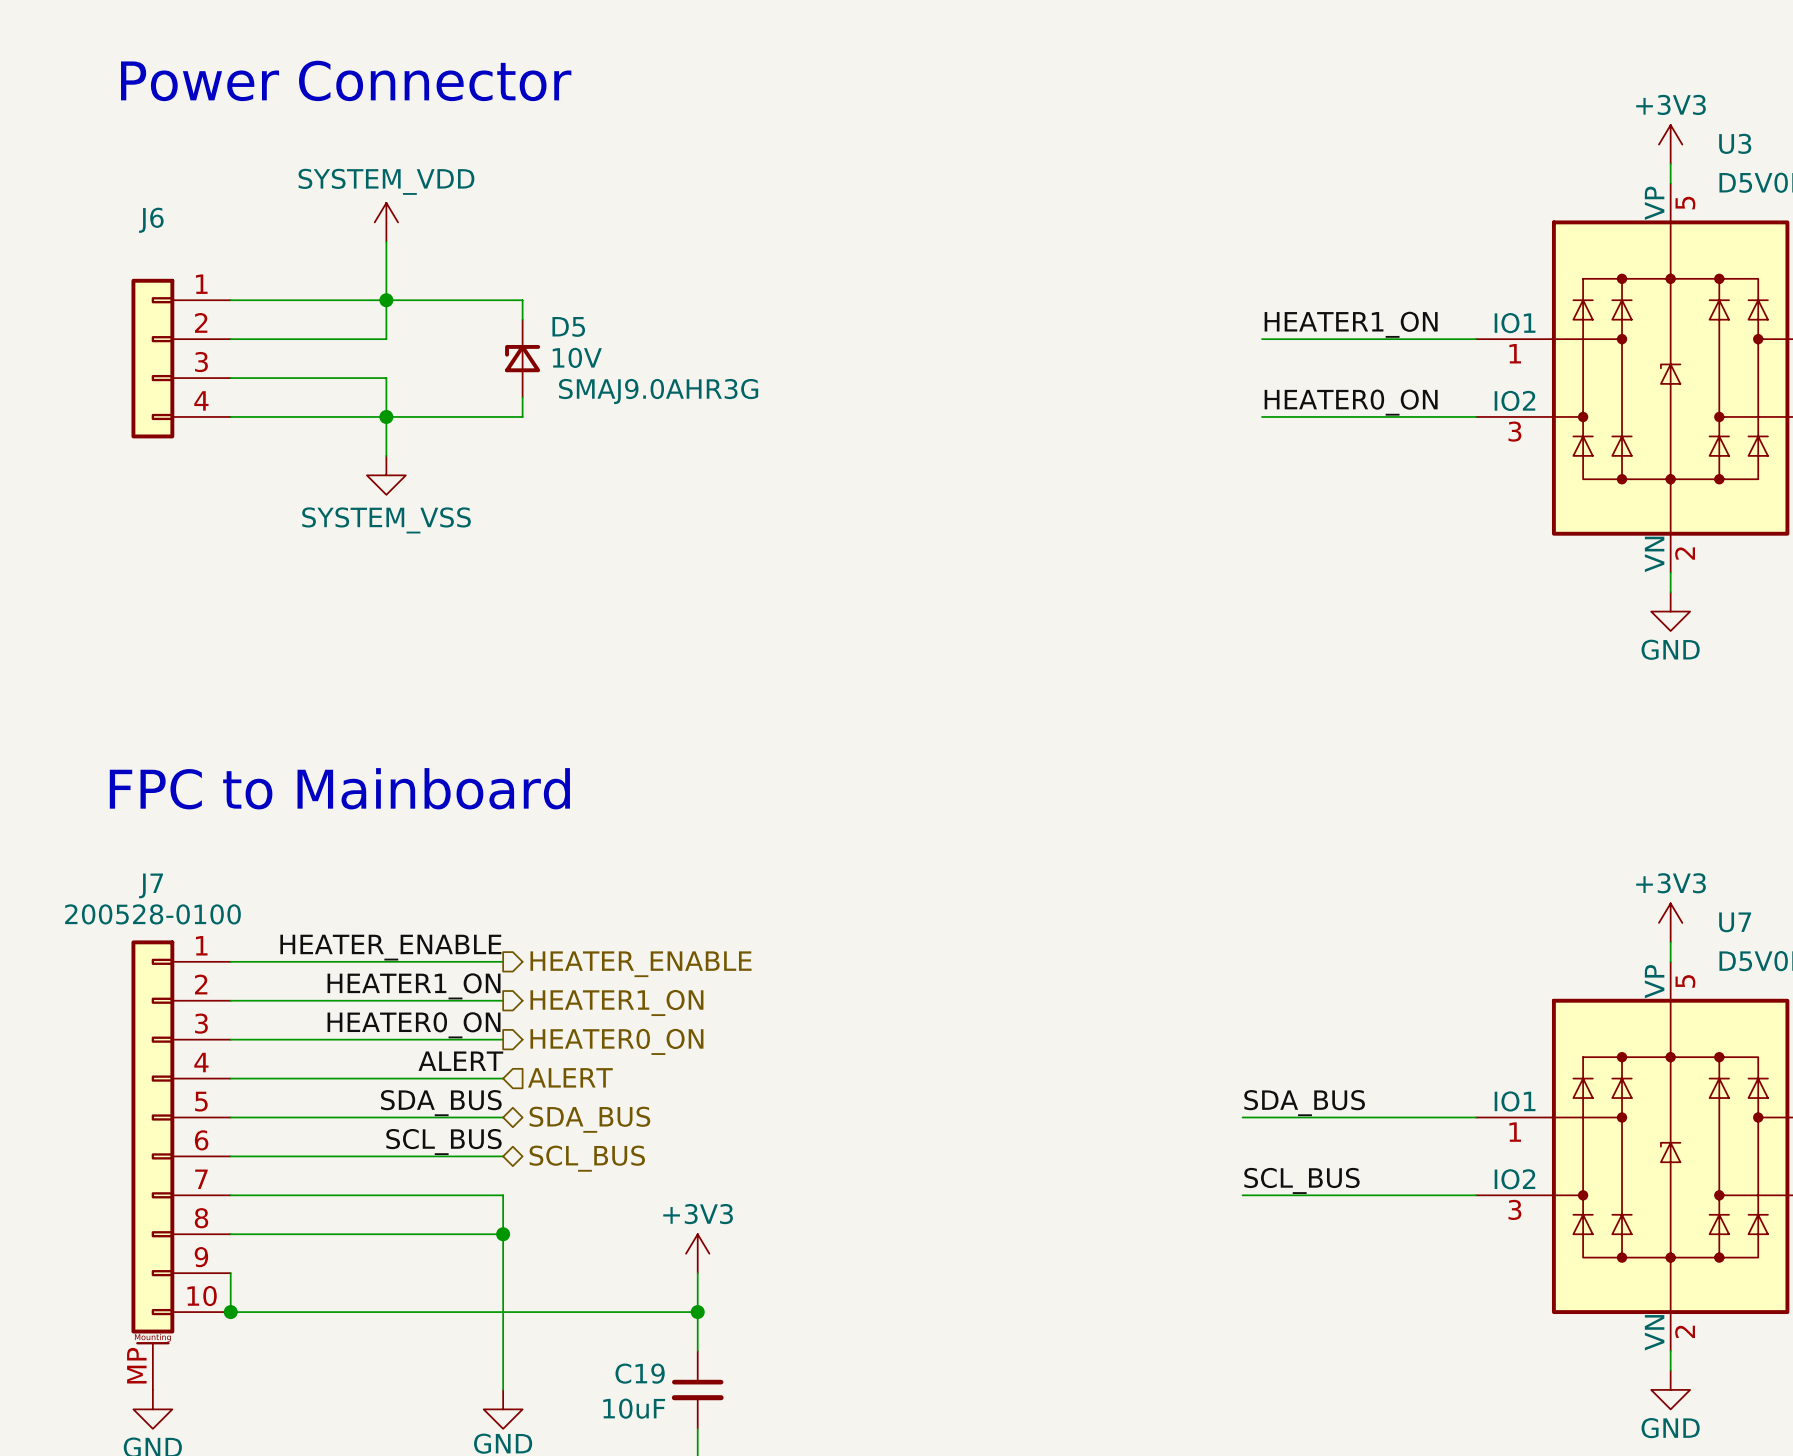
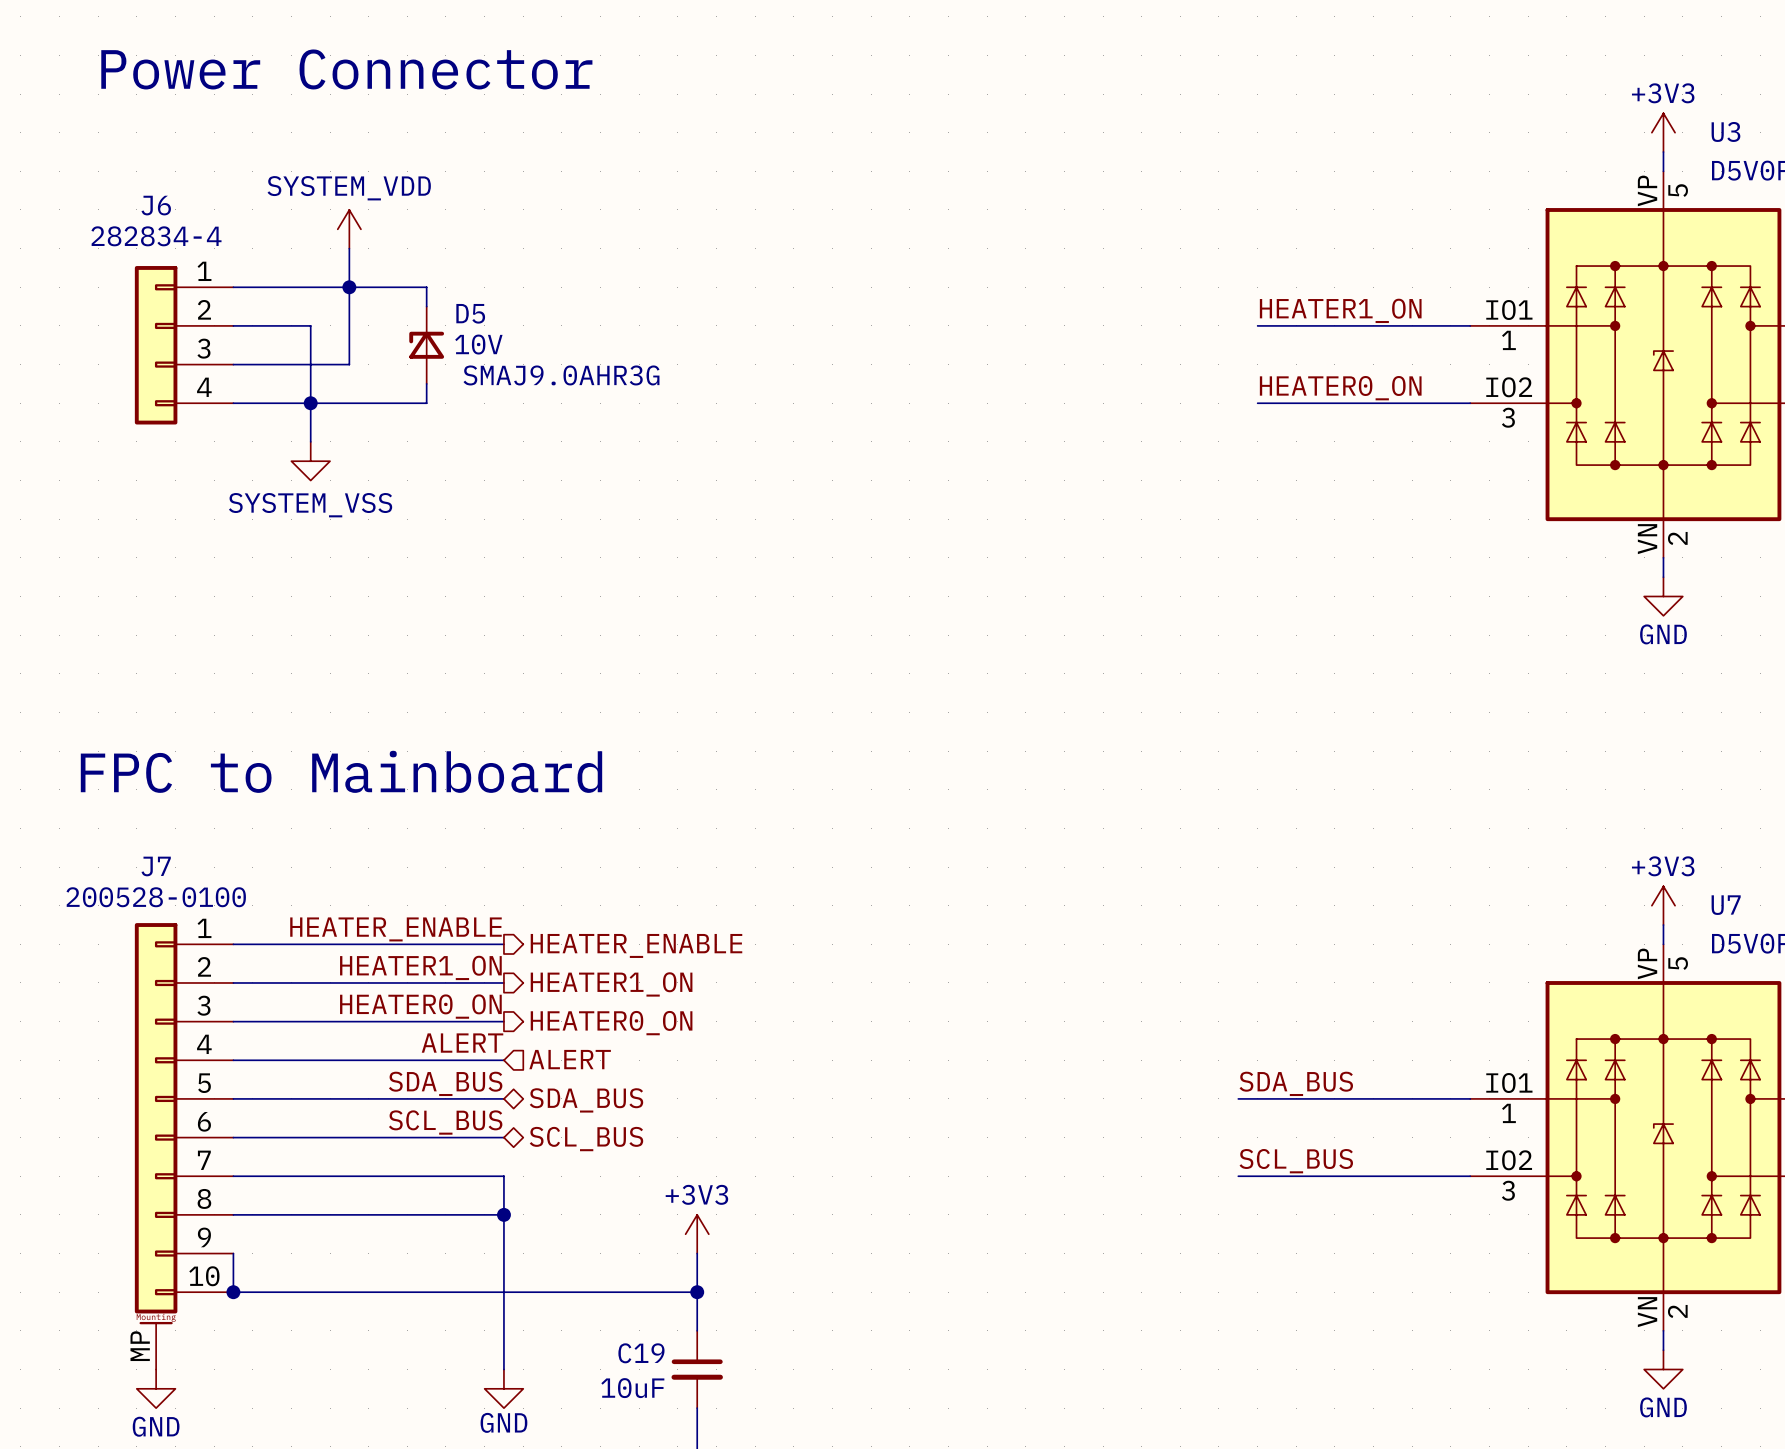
power symbol position: SYSTEM_VDD (386, 222) -> SYSTEM_VDD (349, 229)
wire: (386, 241) (386, 339) (308, 339) -> (310, 441) (310, 325)
J6 value: none -> 282834-4 (156, 236)
junction position: (386, 300) -> (349, 287)
wire: (425, 300) (522, 300) (522, 319) -> (426, 287) (426, 306)
D5 position: (522, 358) -> (426, 345)
wire: (347, 378) (386, 378) (386, 455) -> (349, 364) (349, 248)
wire: (522, 397) (522, 416) (425, 416) -> (426, 383) (426, 403)
junction: none -> (310, 403)
junction: (386, 416) -> none
power symbol position: SYSTEM_VSS (386, 475) -> SYSTEM_VSS (310, 461)

